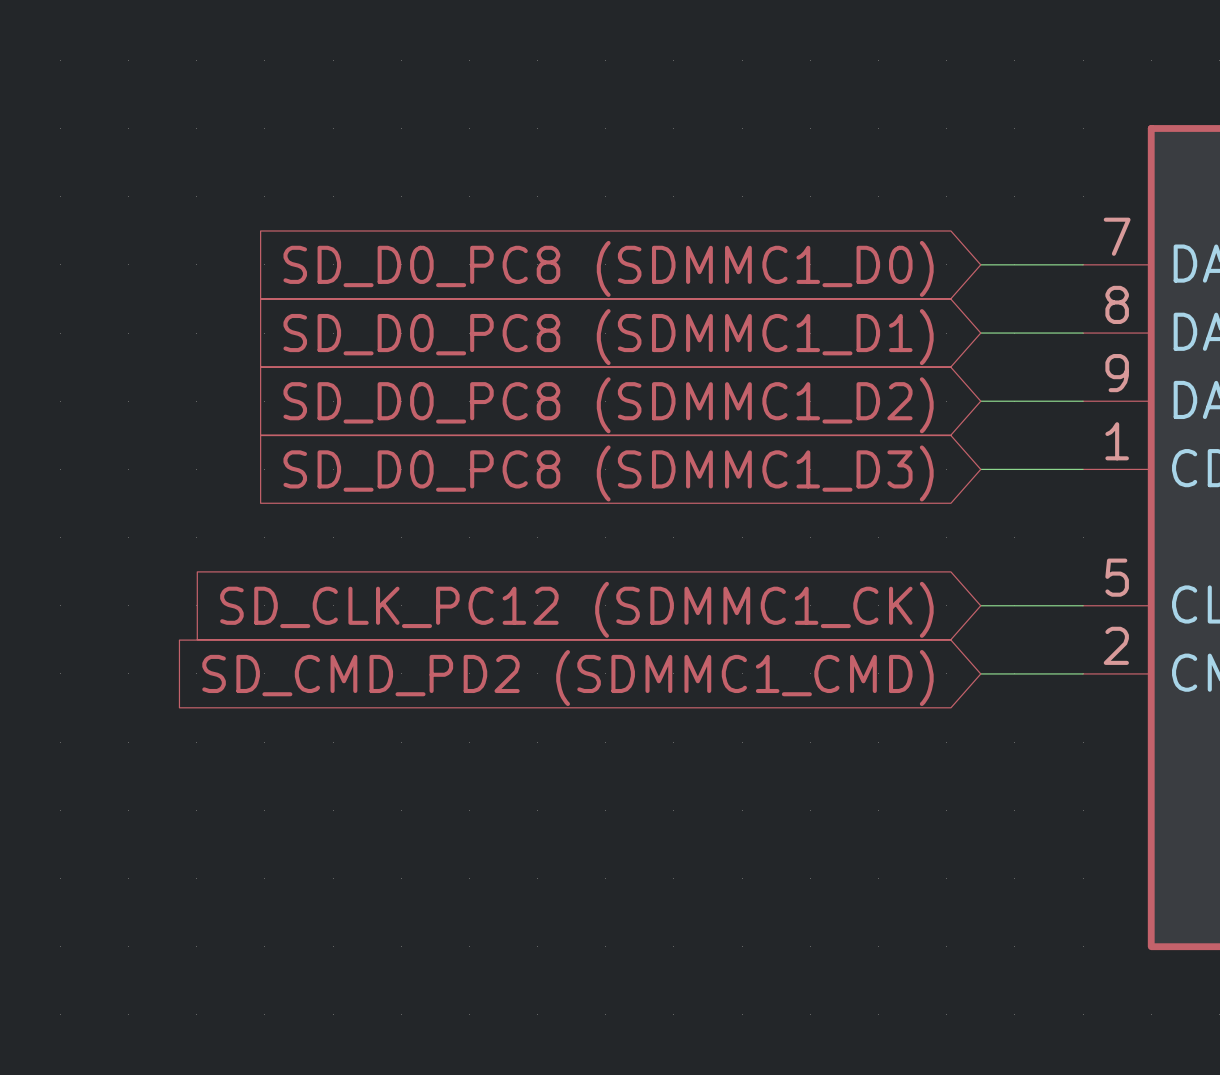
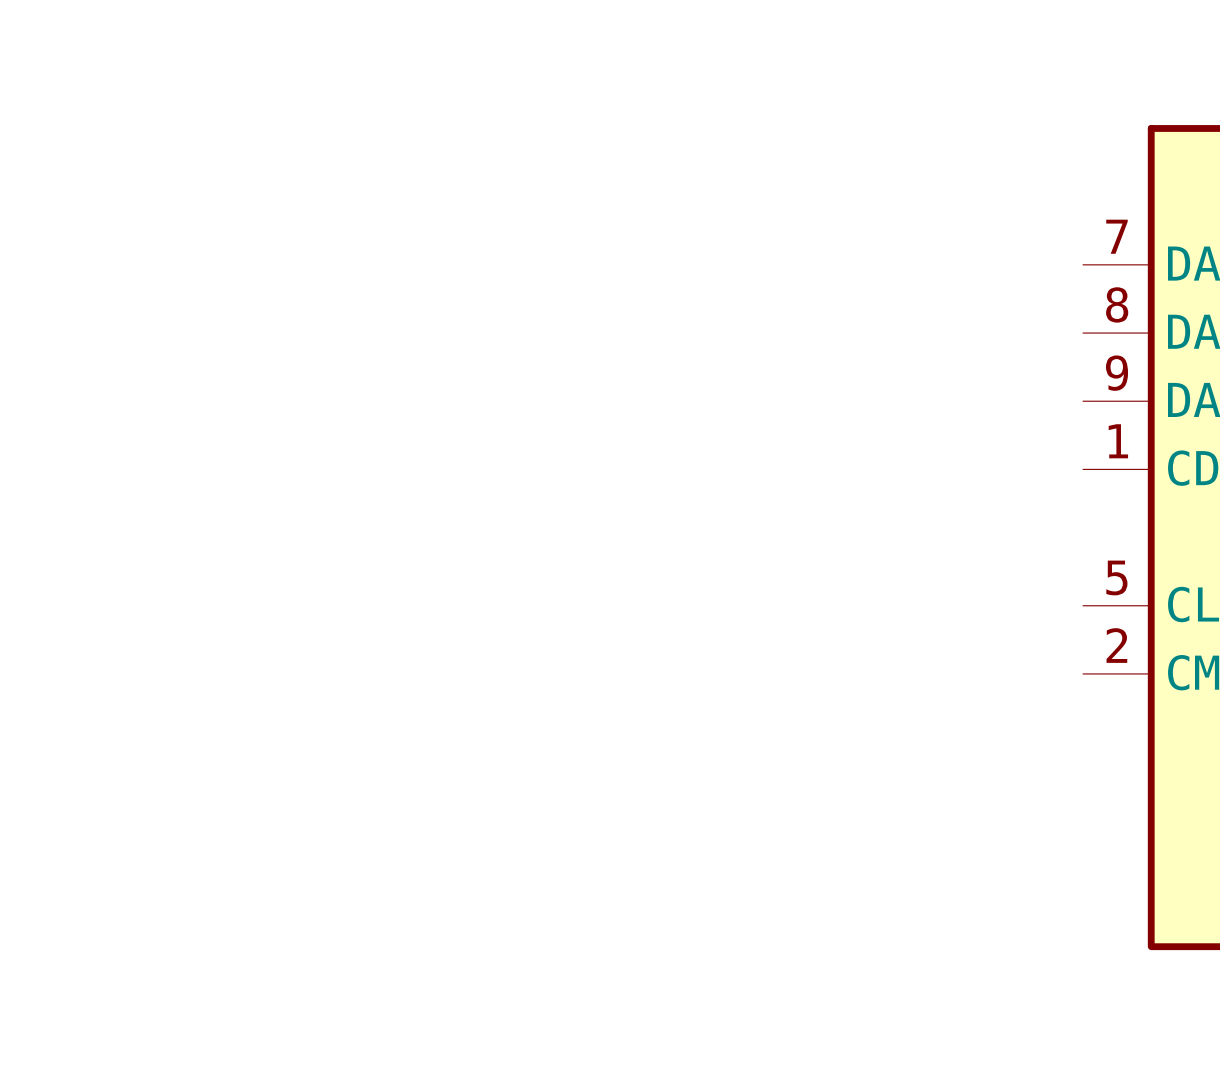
wire: (980, 264) (1083, 264) -> none
global label: SD_D0_PC8 (SDMMC1_D0) (608, 268) -> none
wire: (980, 333) (1083, 333) -> none
global label: SD_D0_PC8 (SDMMC1_D1) (608, 337) -> none
wire: (980, 401) (1083, 401) -> none
global label: SD_D0_PC8 (SDMMC1_D2) (608, 405) -> none
wire: (980, 469) (1083, 469) -> none
global label: SD_D0_PC8 (SDMMC1_D3) (608, 473) -> none
wire: (980, 605) (1083, 605) -> none
global label: SD_CLK_PC12 (SDMMC1_CK) (576, 609) -> none
wire: (980, 673) (1083, 673) -> none
global label: SD_CMD_PD2 (SDMMC1_CMD) (567, 678) -> none

